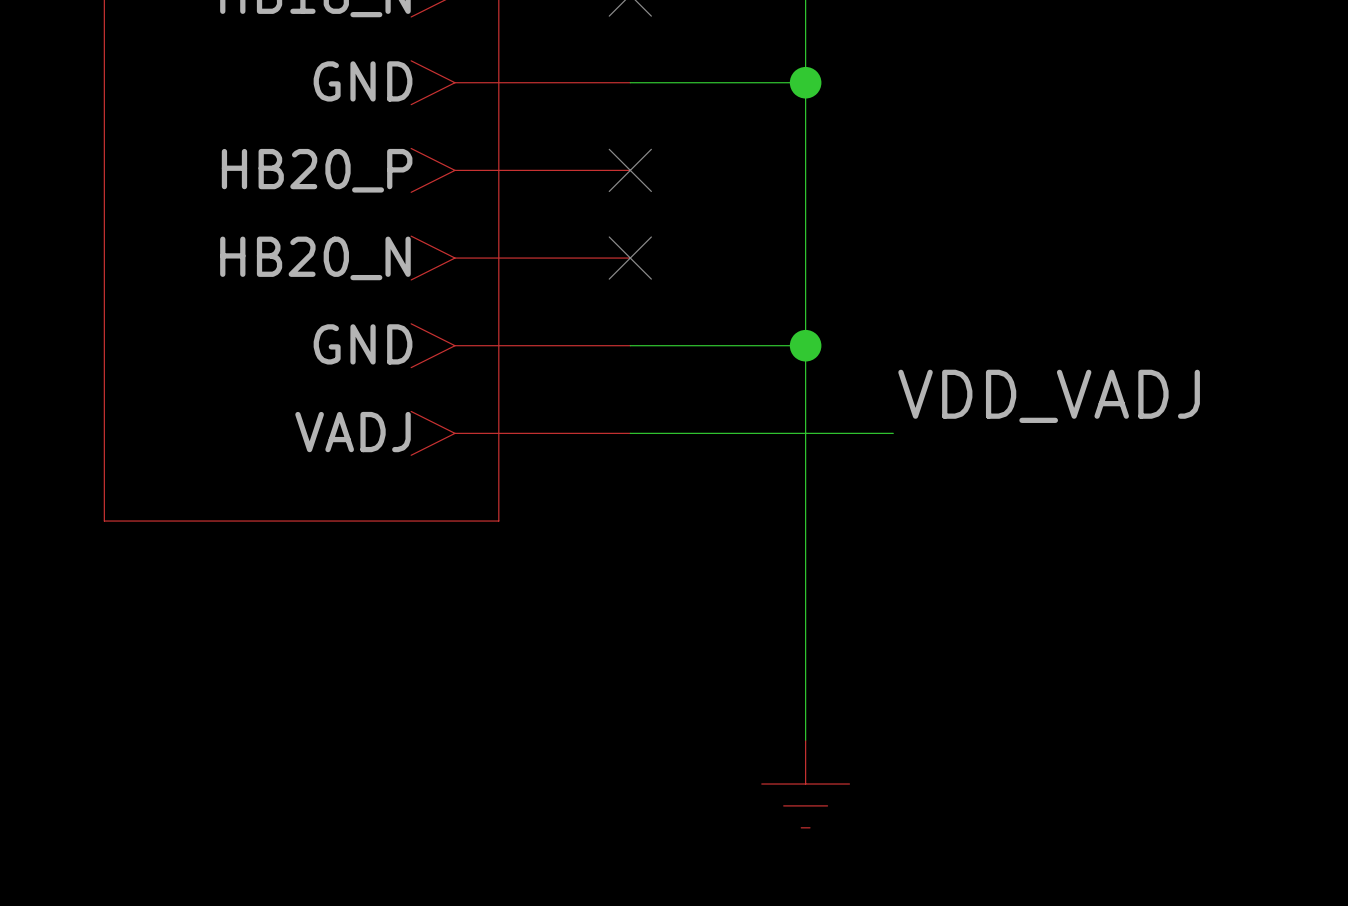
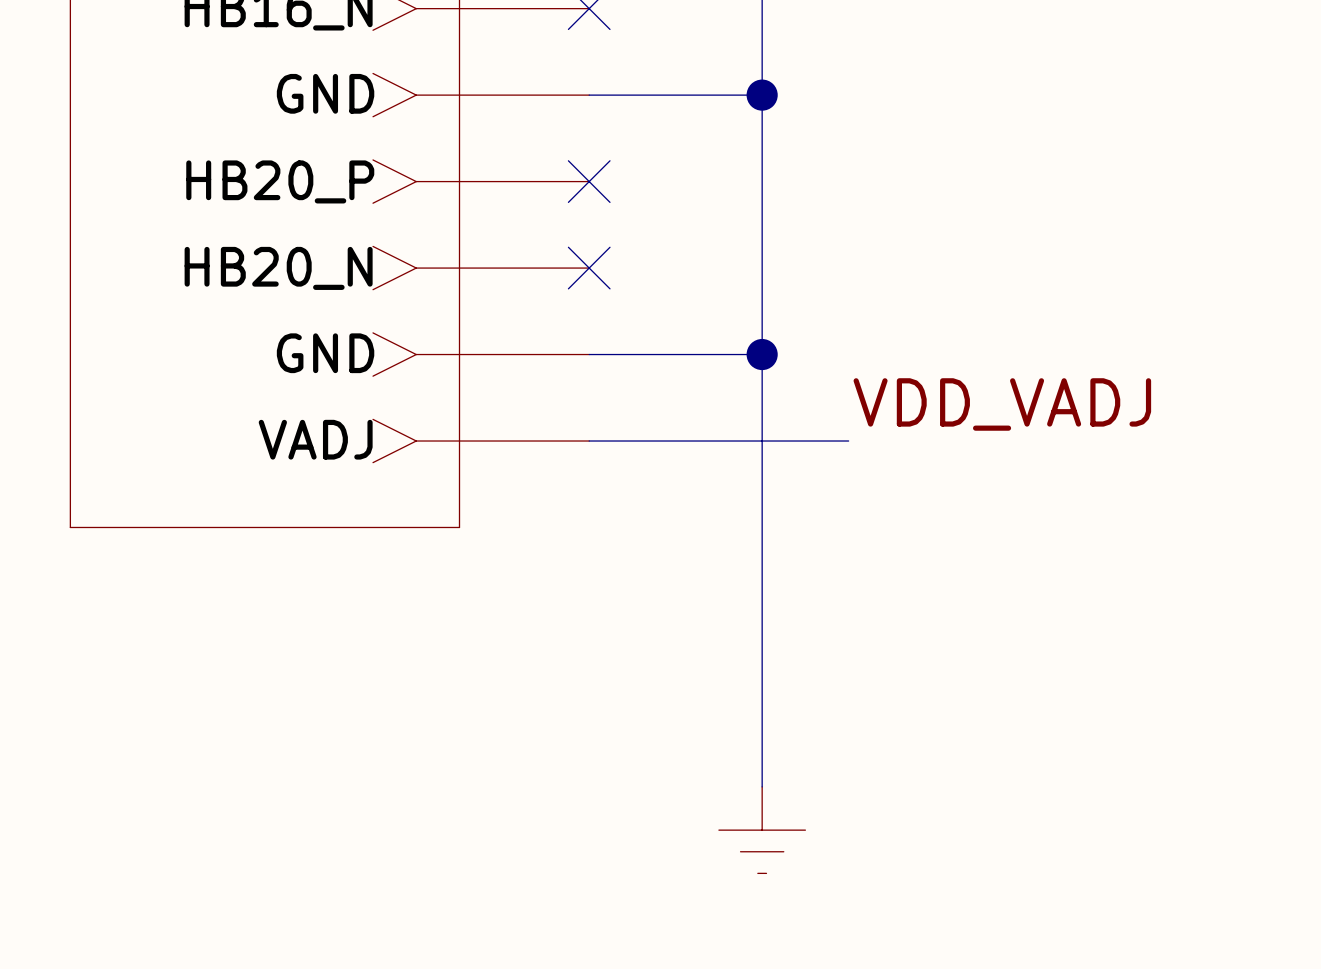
power symbol position: (805, 784) -> (762, 830)

